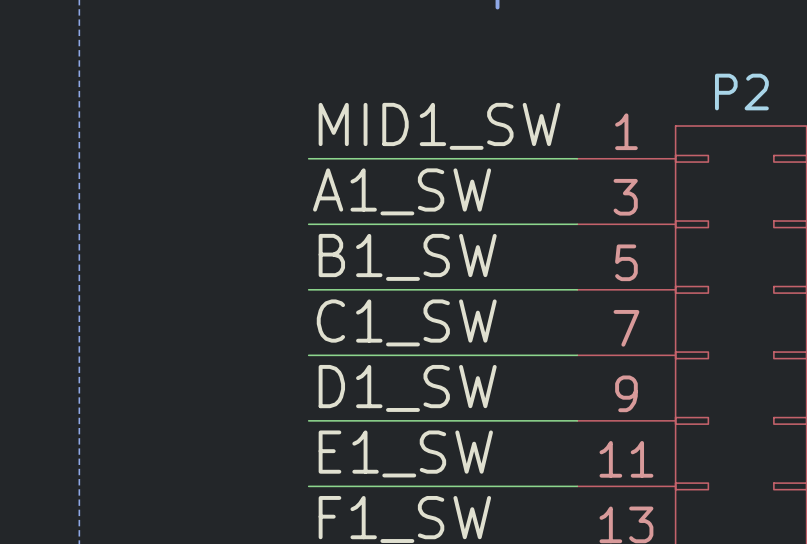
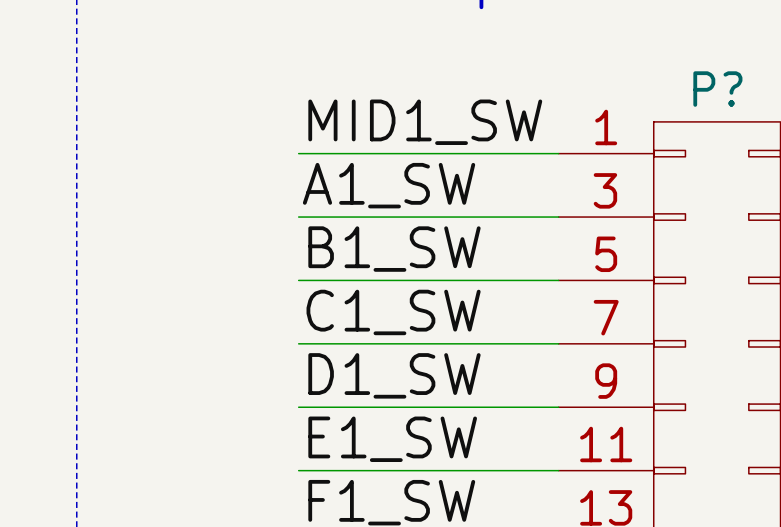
P2 name: P2 (741, 92) -> P? (717, 89)

